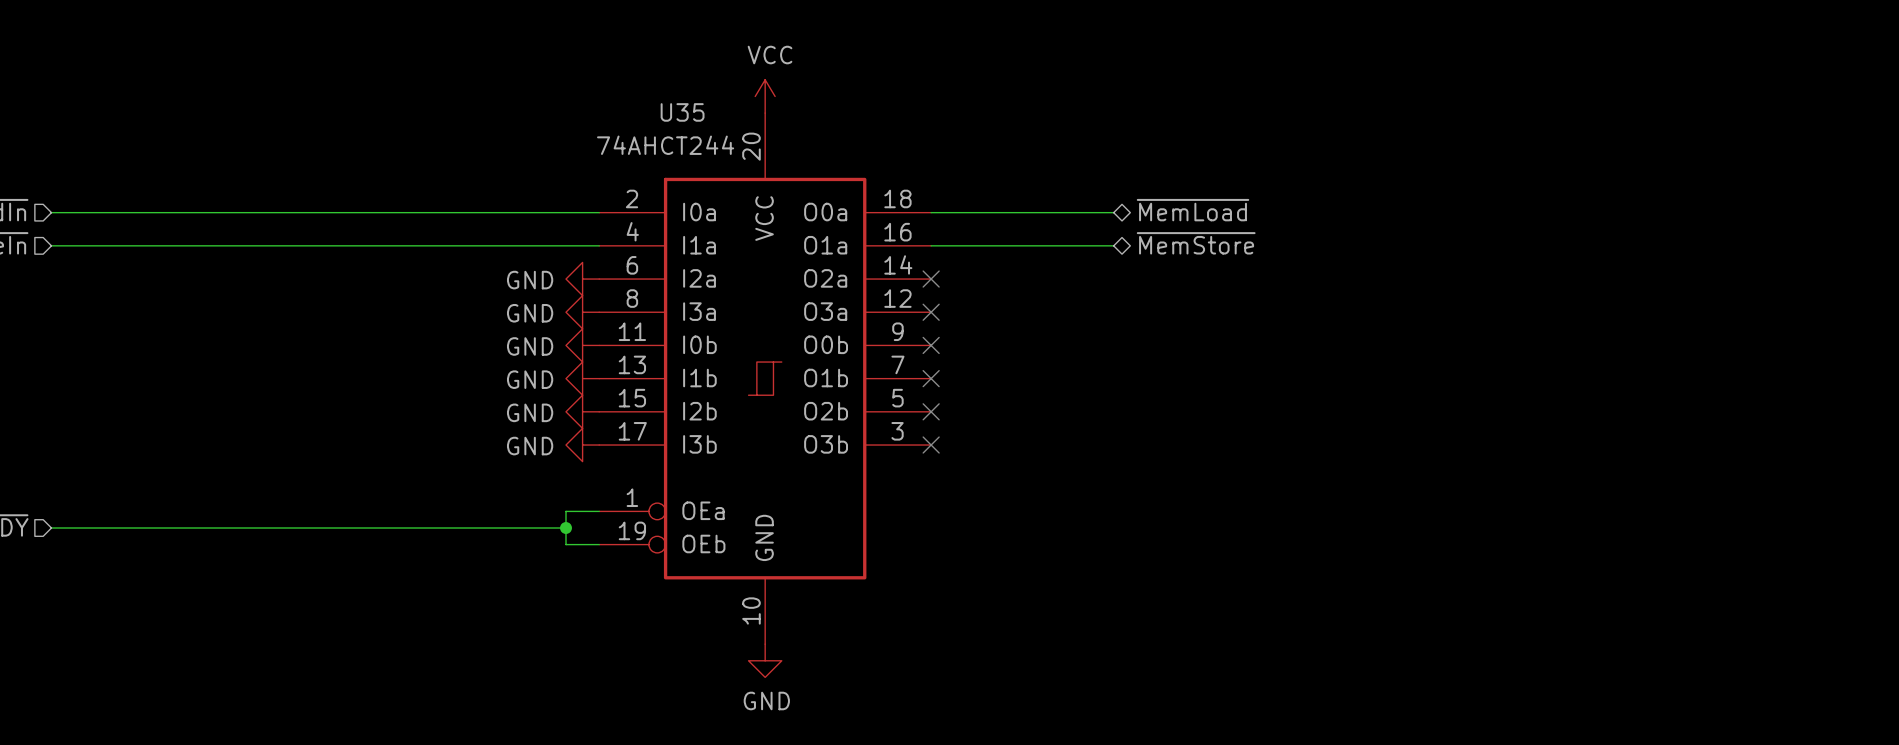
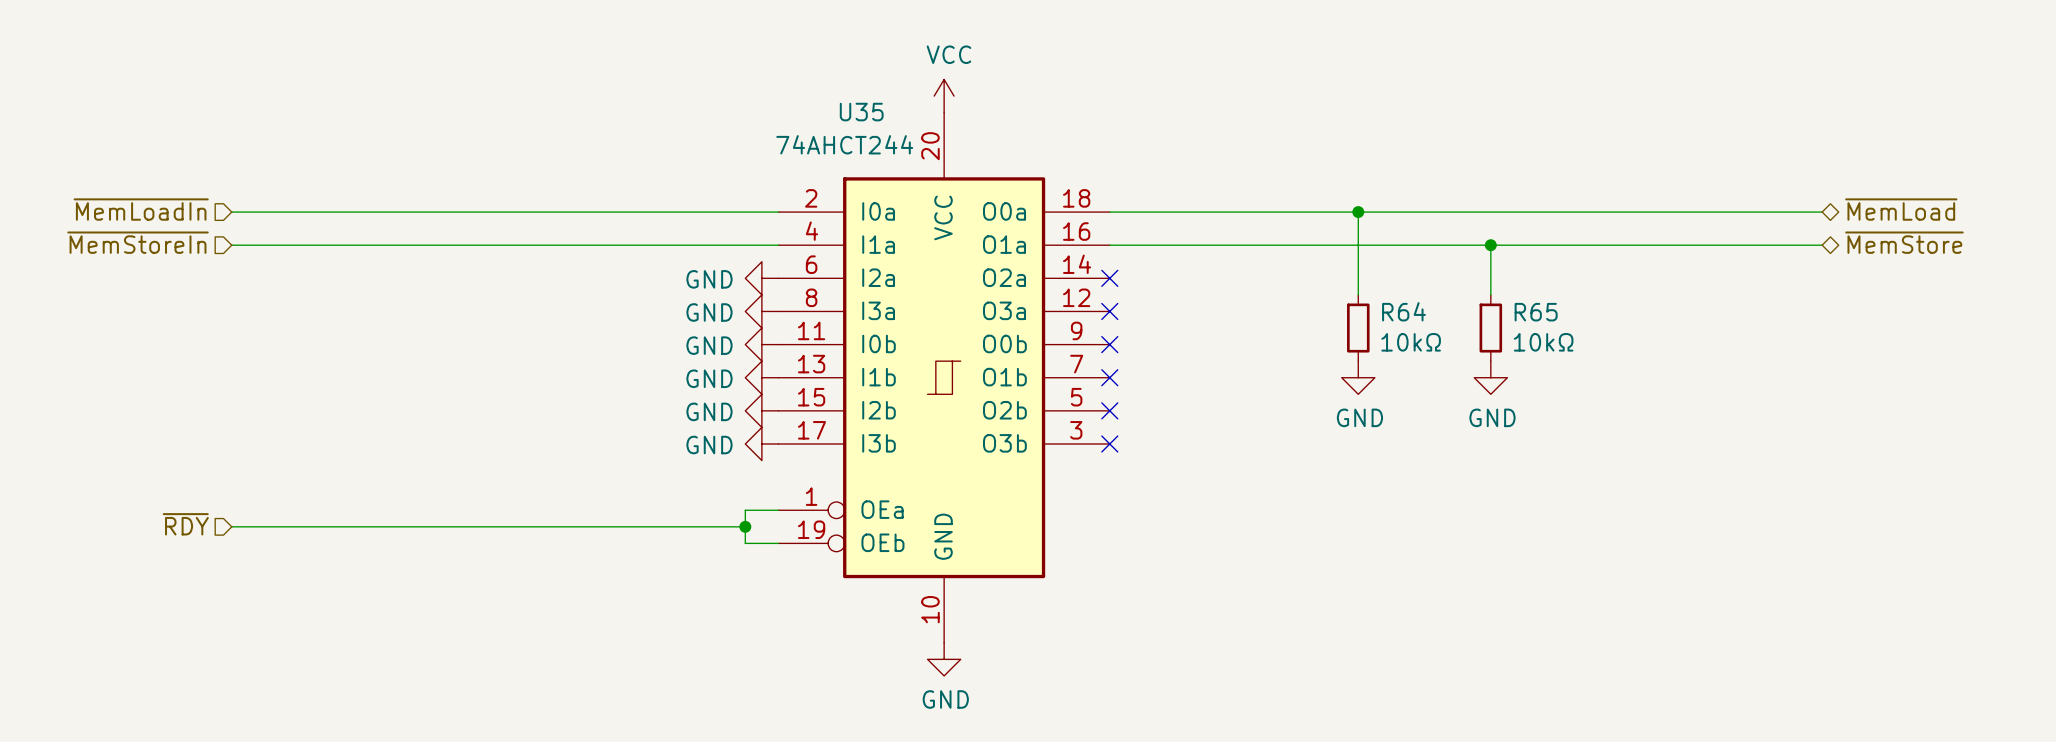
hierarchical label: ~{MemLoad} (1193, 210) -> none
hierarchical label: none -> ~{MemLoad} (1901, 209)
wire: none -> (1292, 212) (1822, 212)
wire: none -> (1358, 212) (1358, 294)
junction: none -> (1358, 212)
hierarchical label: ~{MemStore} (1196, 243) -> none
hierarchical label: none -> ~{MemStore} (1904, 242)
wire: none -> (1292, 245) (1822, 245)
wire: none -> (1490, 245) (1490, 294)
junction: none -> (1490, 245)
R64: none -> 10kΩ (1358, 328)
R65: none -> 10kΩ (1490, 328)
power symbol: none -> GND (1358, 377)
power symbol: none -> GND (1490, 377)

